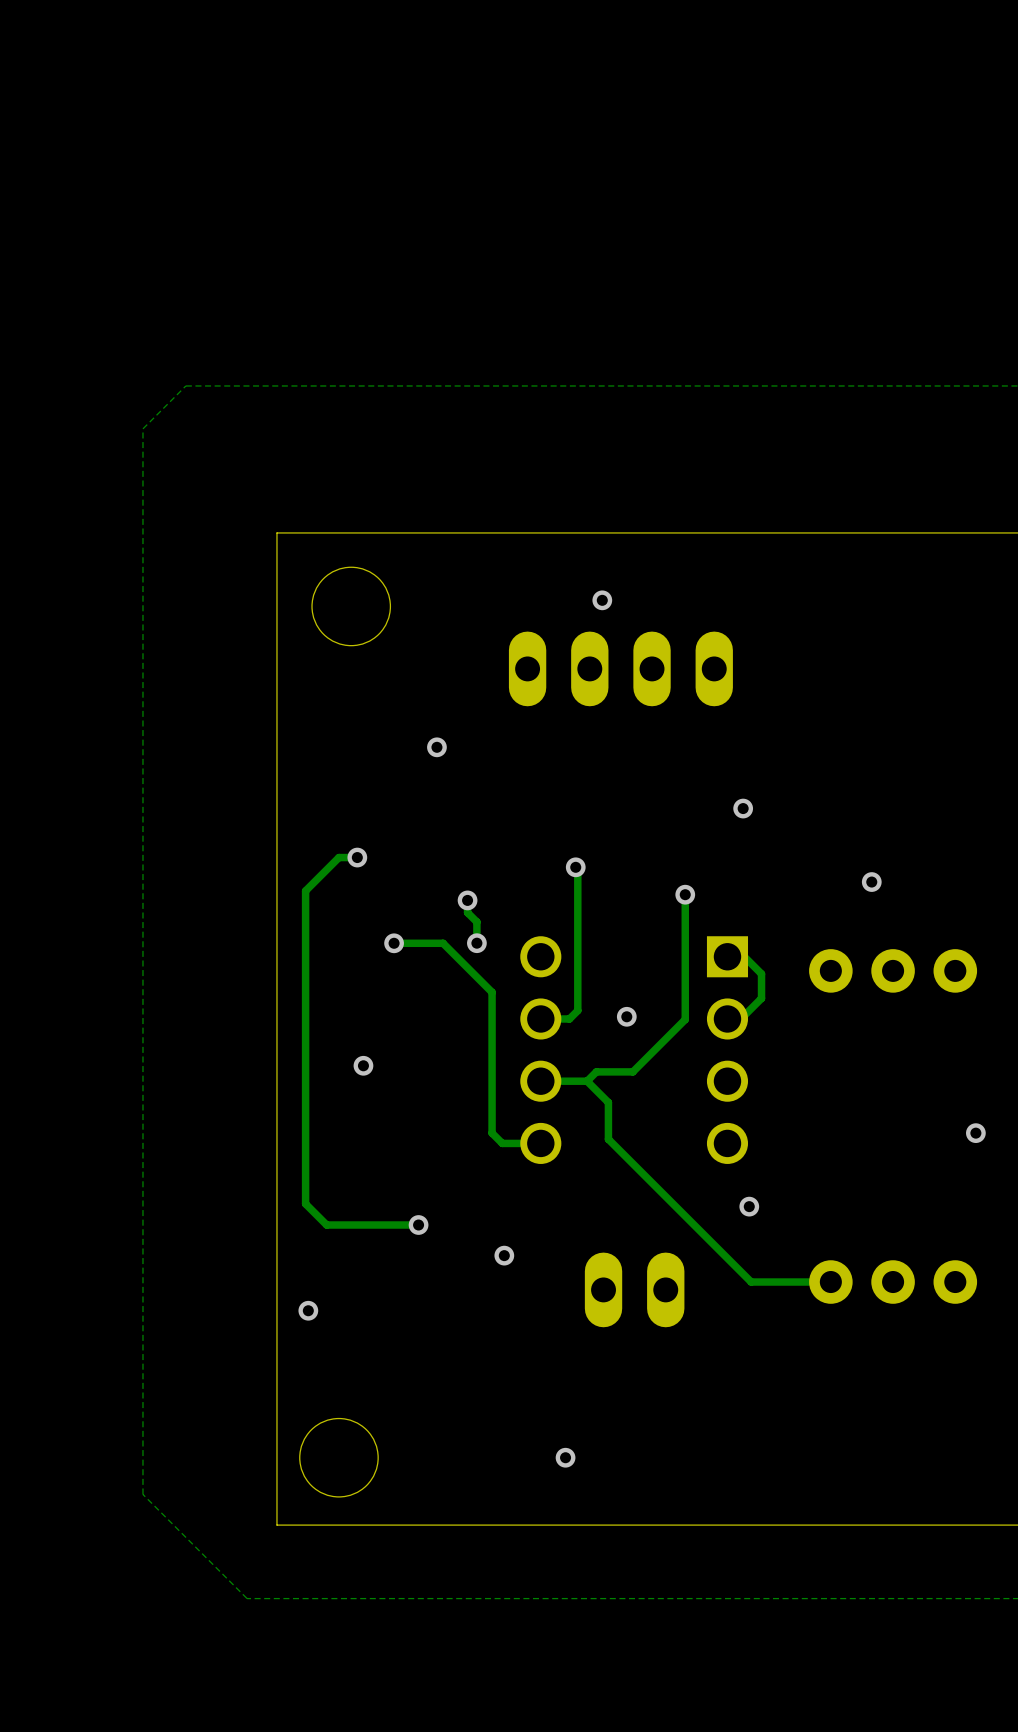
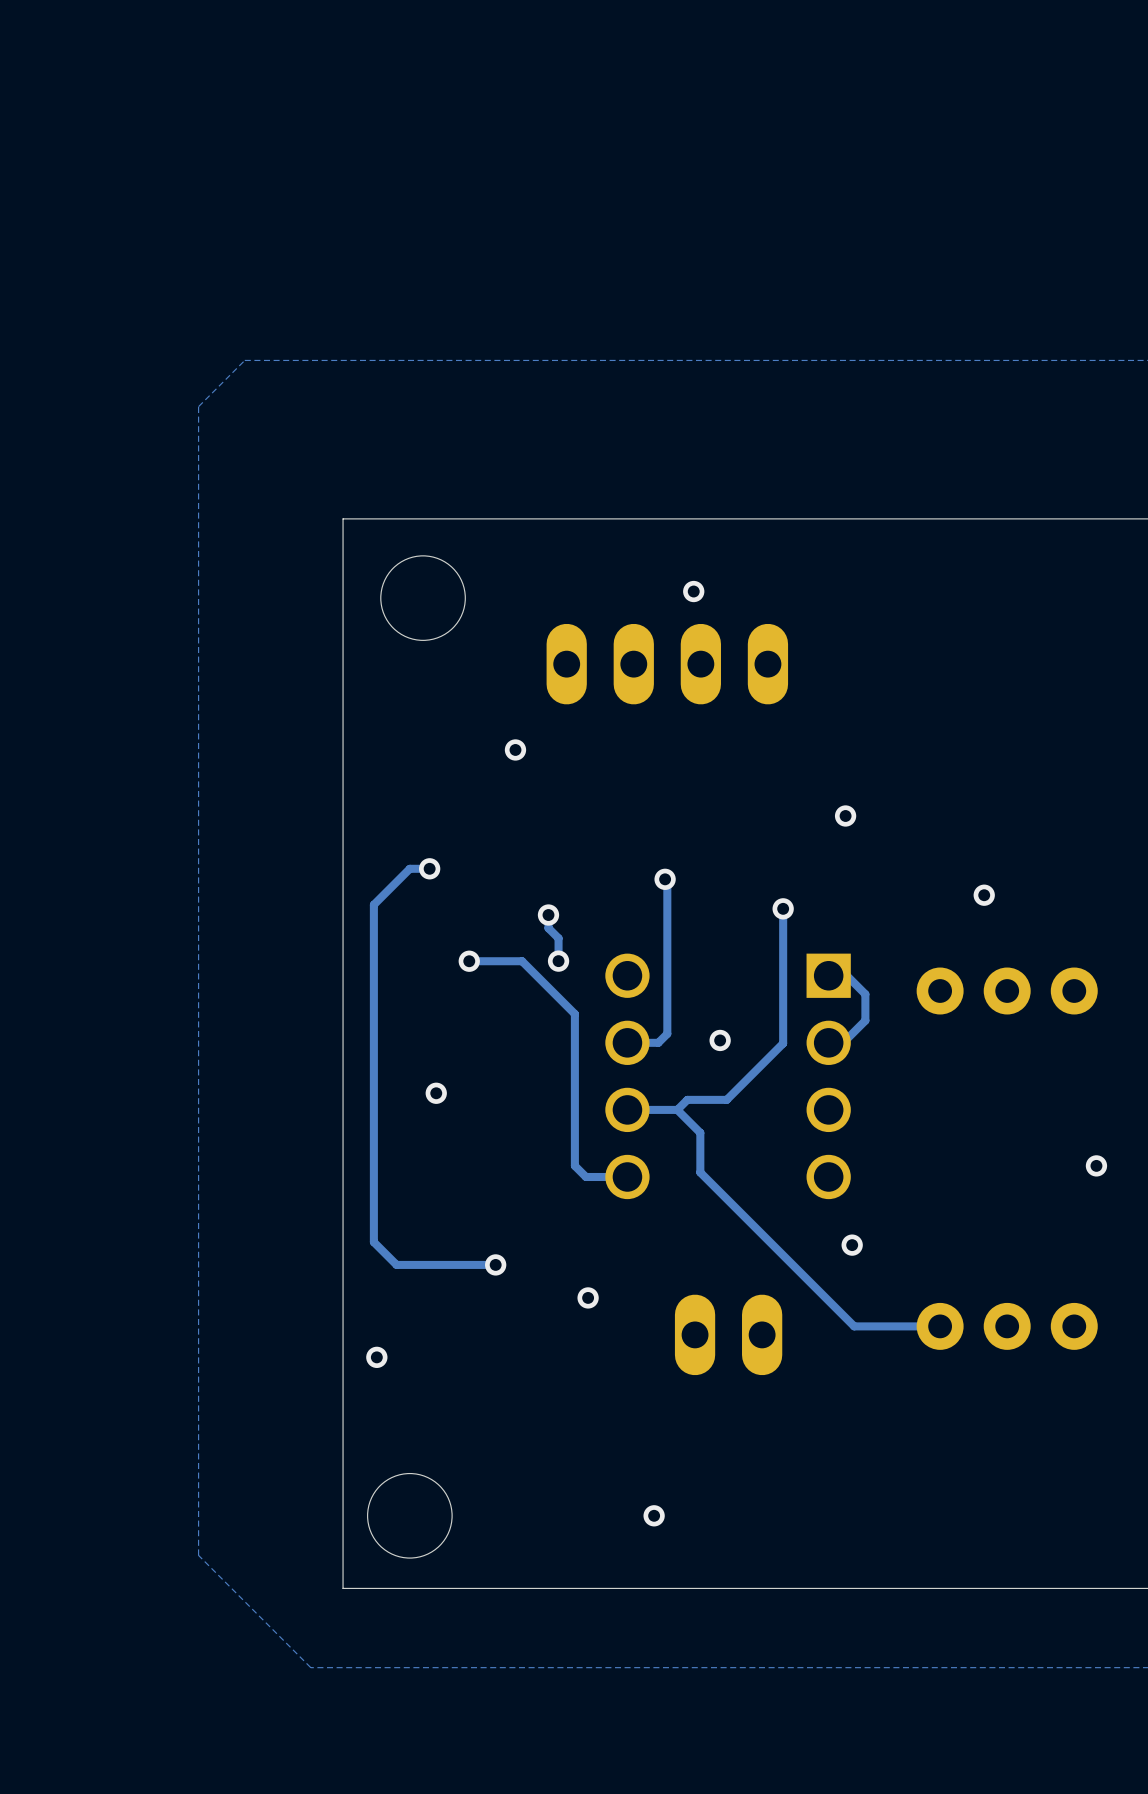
part position: (620, 668) -> (667, 664)

